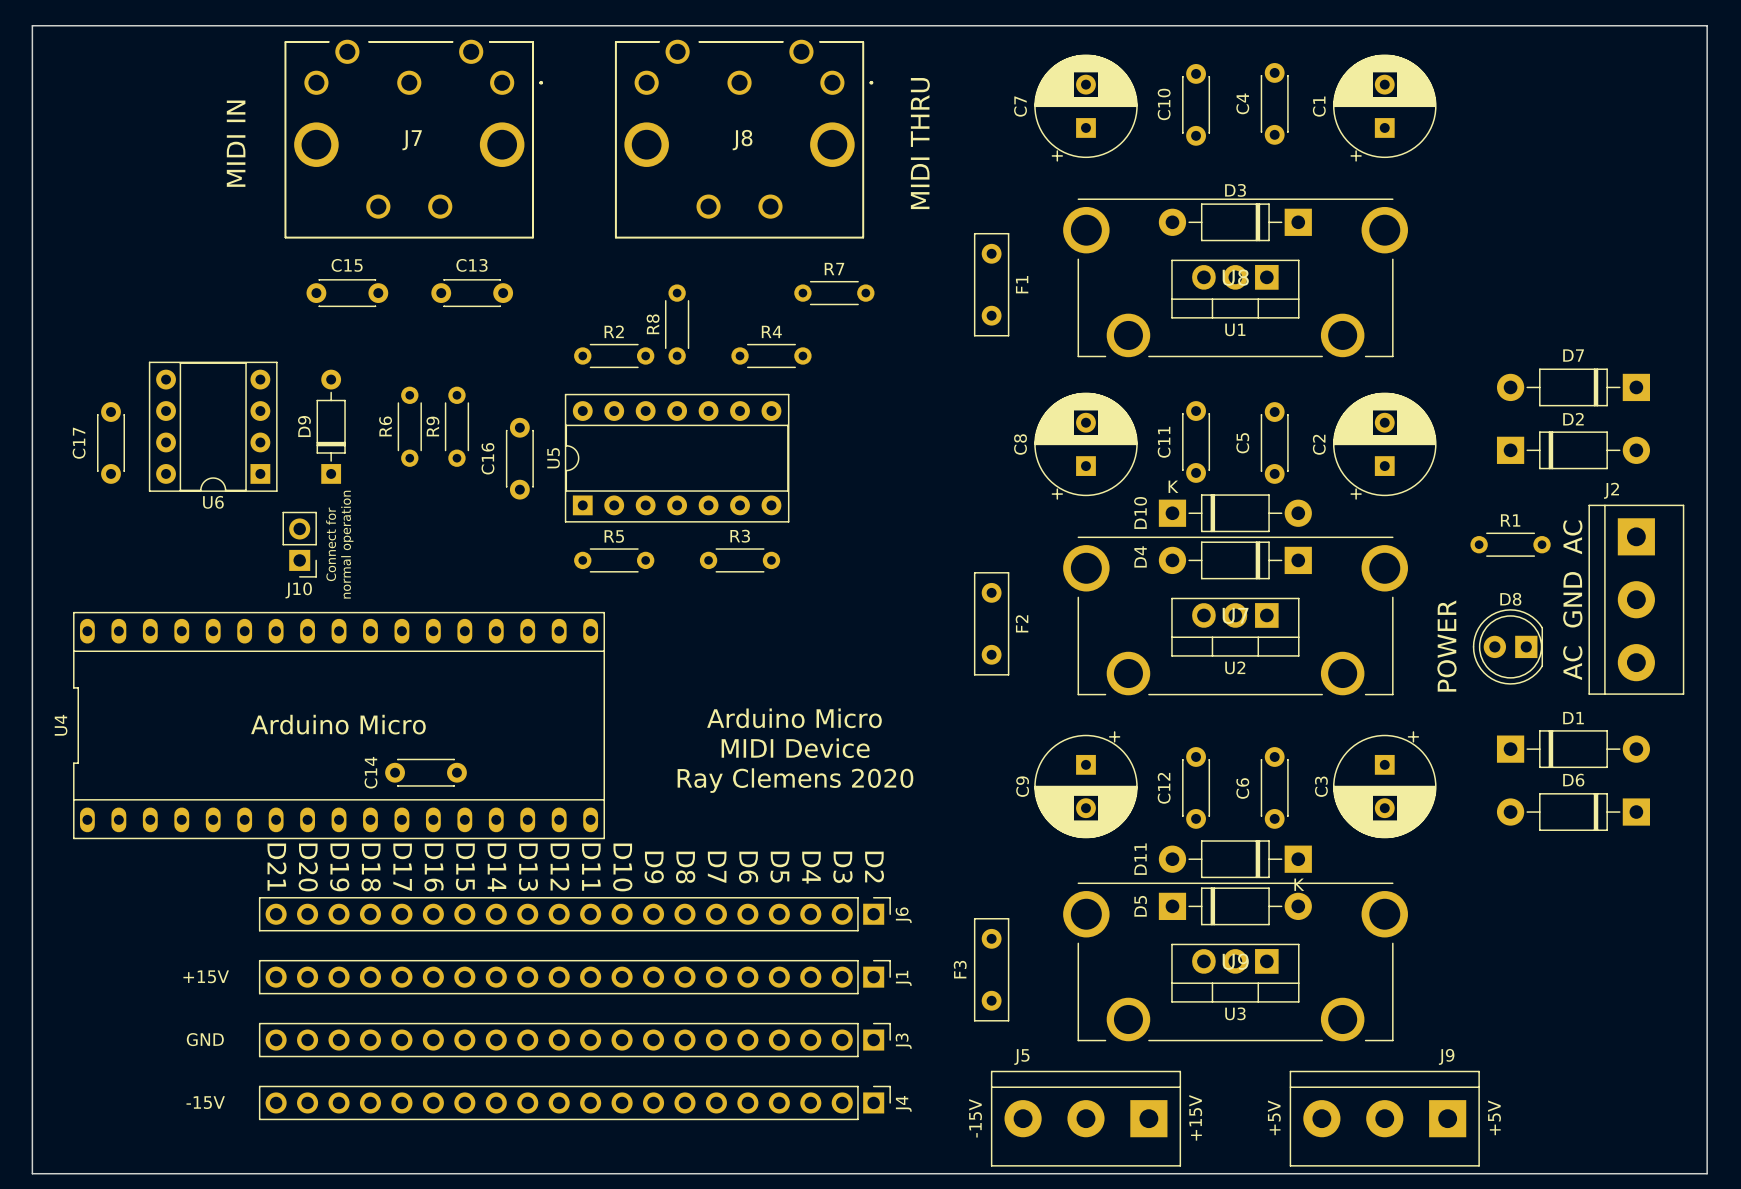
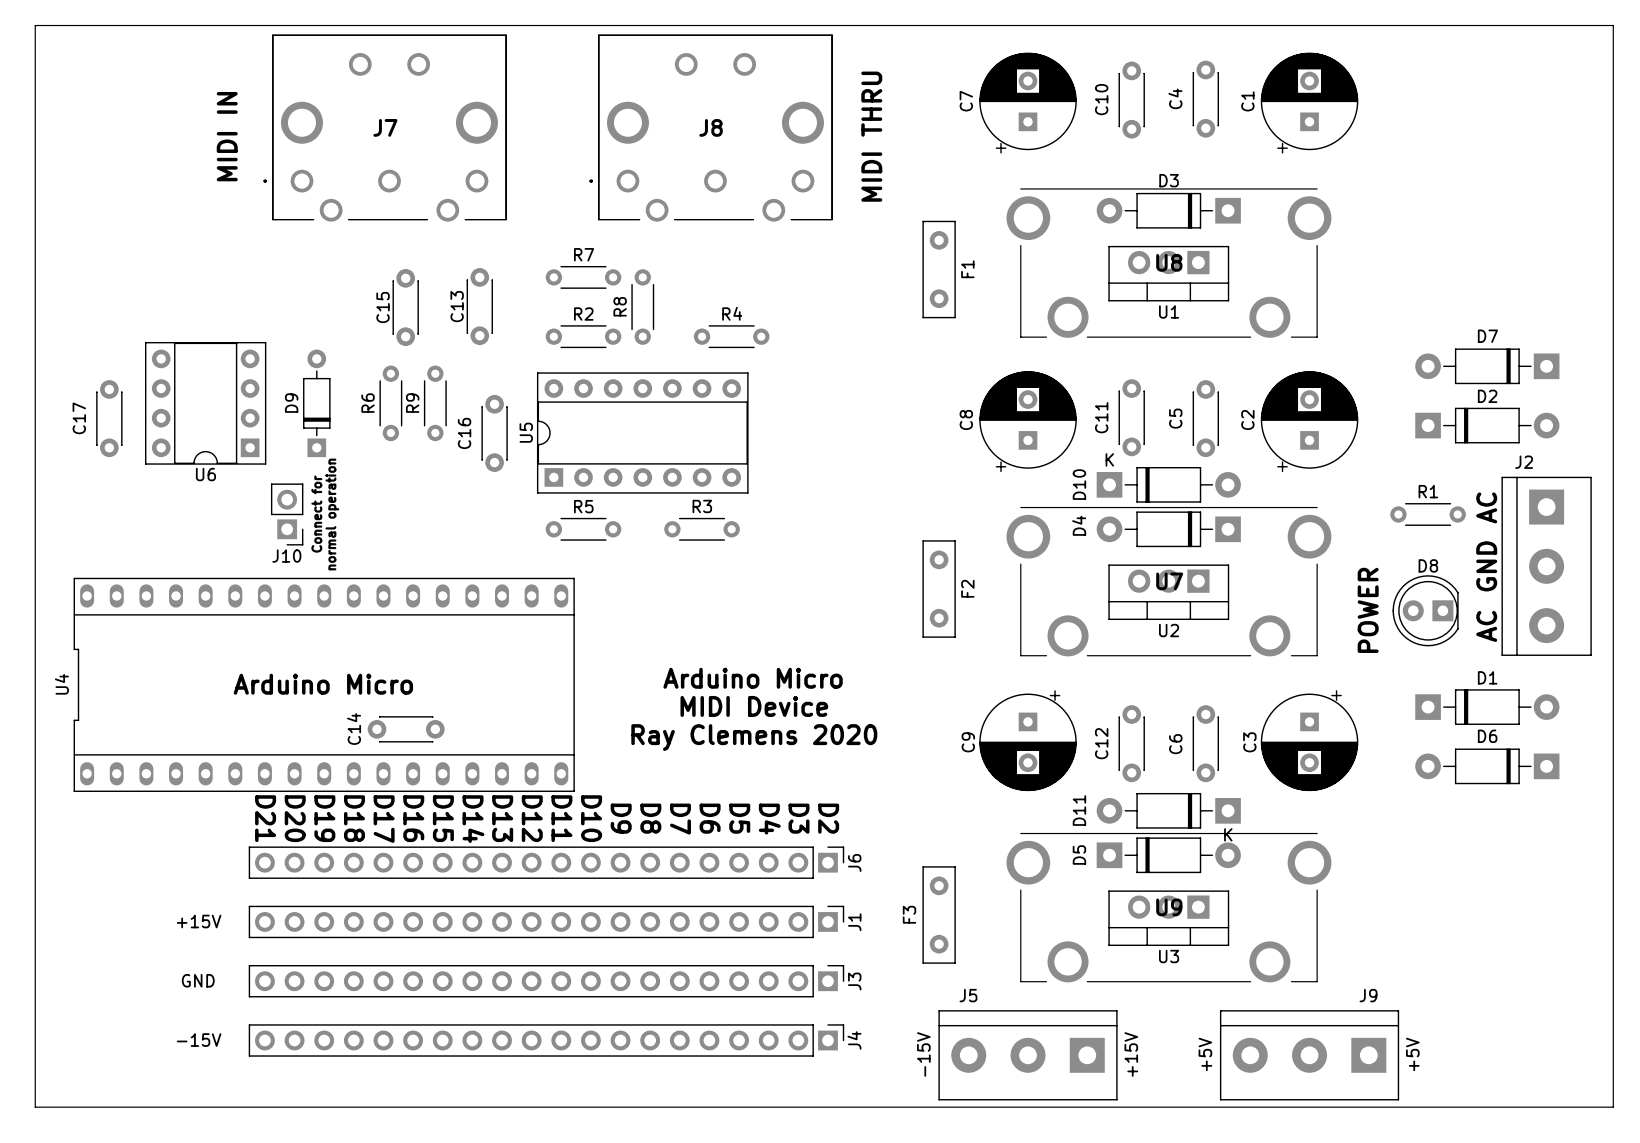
J7 rotation: 0° (413, 138) -> 180° (385, 128)
J8 rotation: 0° (744, 138) -> 180° (711, 128)
C15 name position: C15 (347, 265) -> C15 (383, 307)
C13 name position: C13 (471, 265) -> C13 (457, 306)
C15 rotation: 0° (347, 293) -> 90° clockwise (405, 307)
C15 position: (347, 293) -> (405, 307)
C13 rotation: 0° (472, 293) -> 90° clockwise (479, 306)
R7 position: (834, 293) -> (583, 277)

